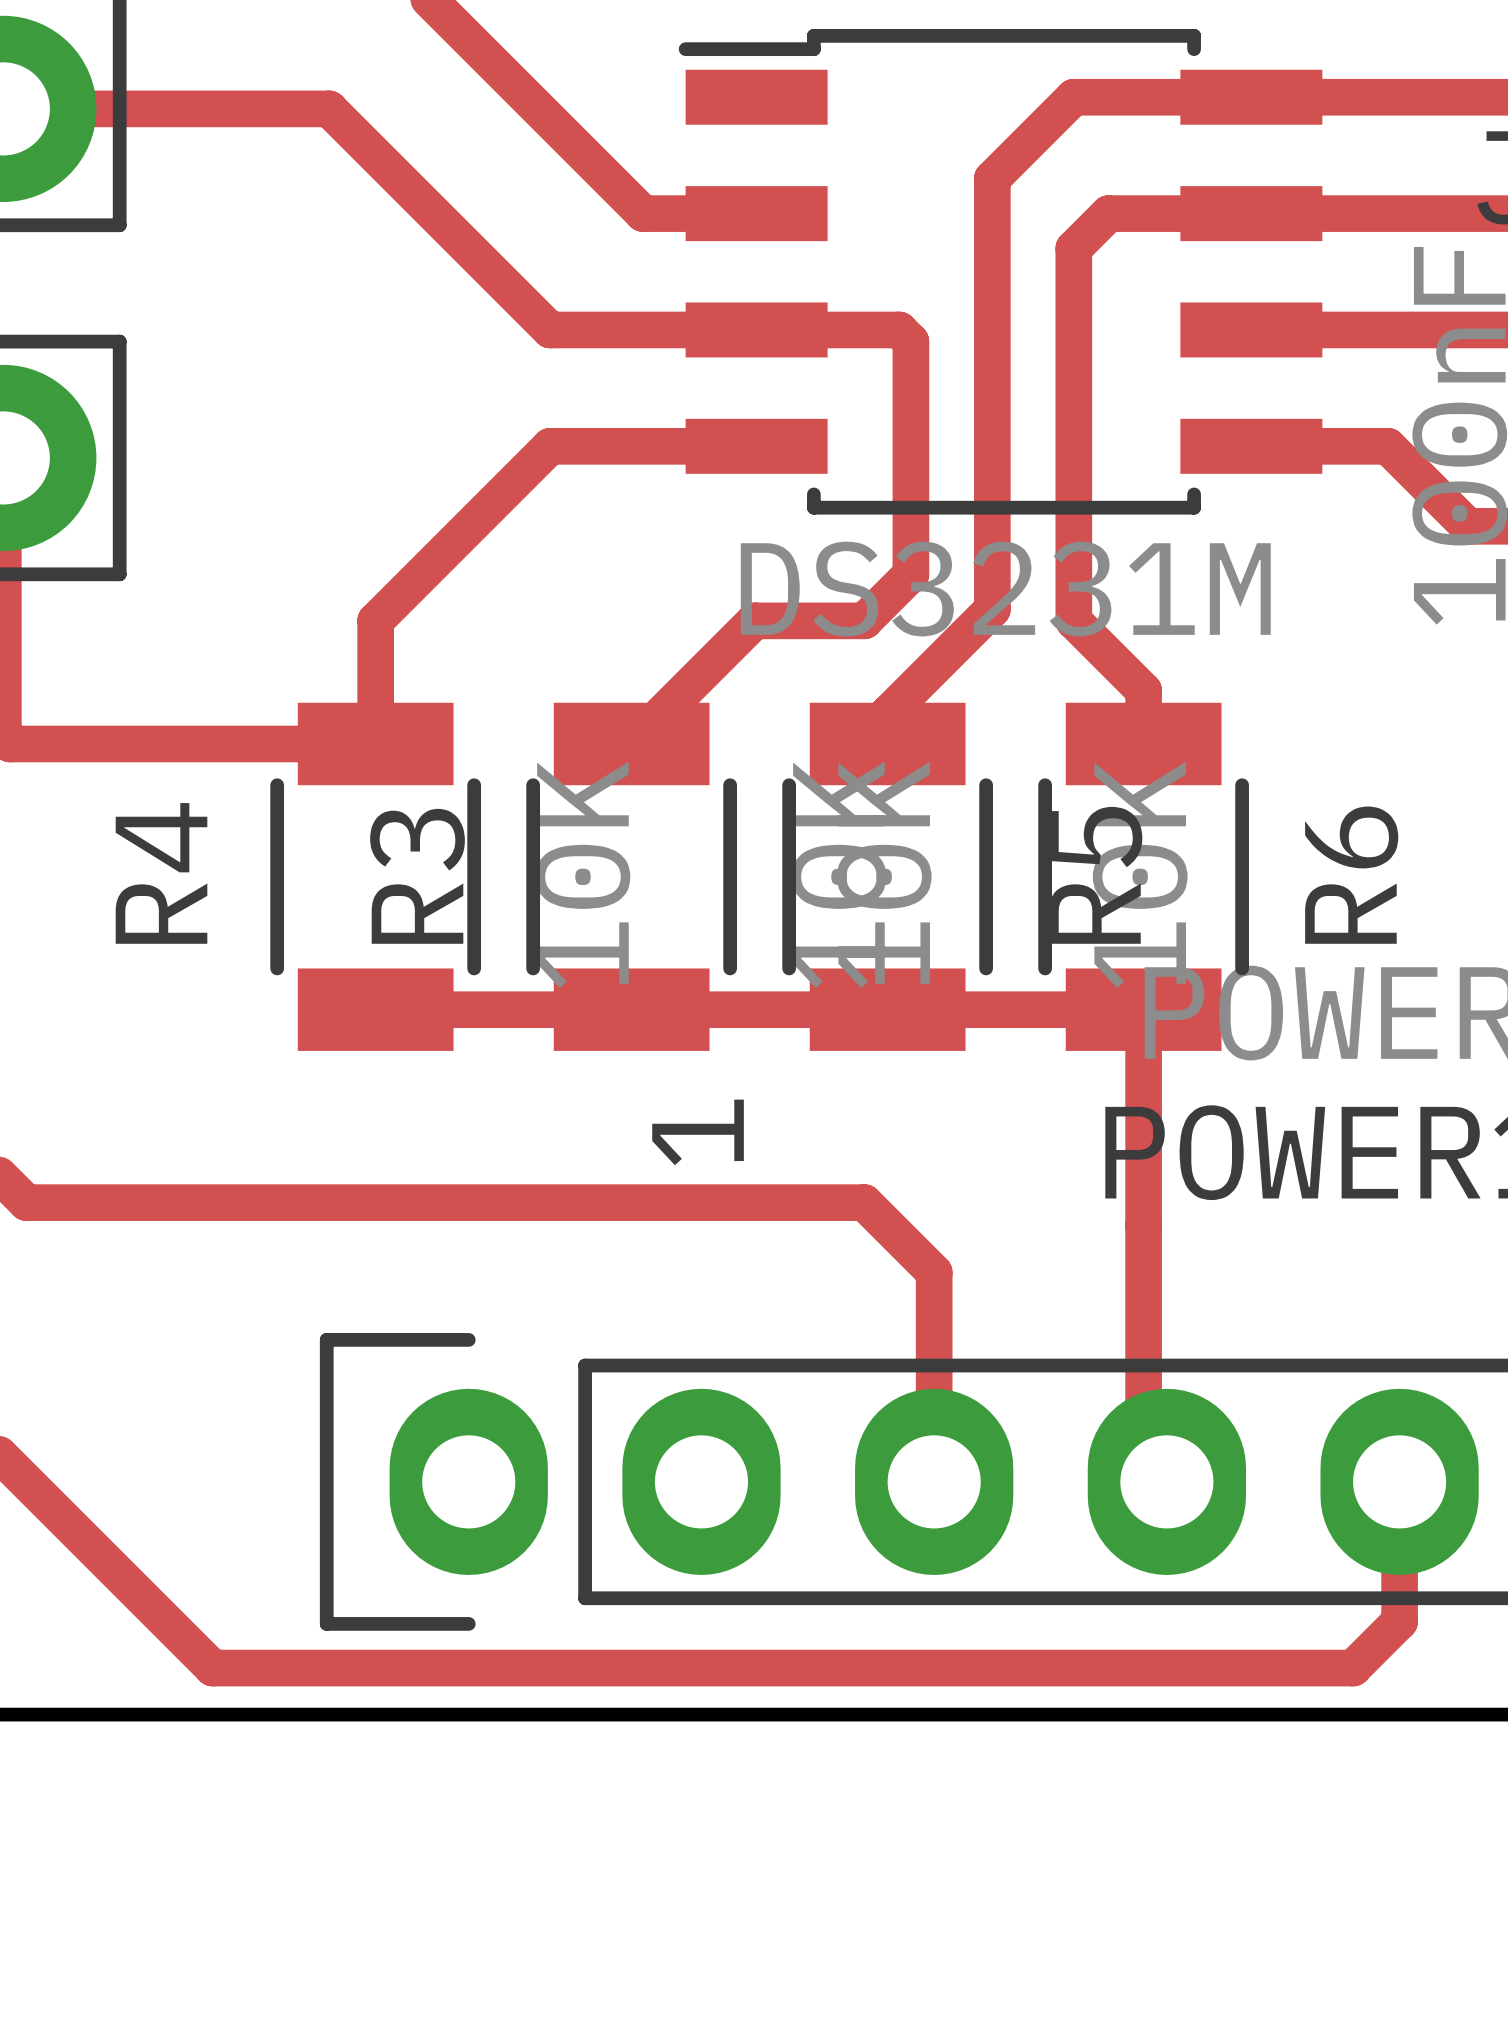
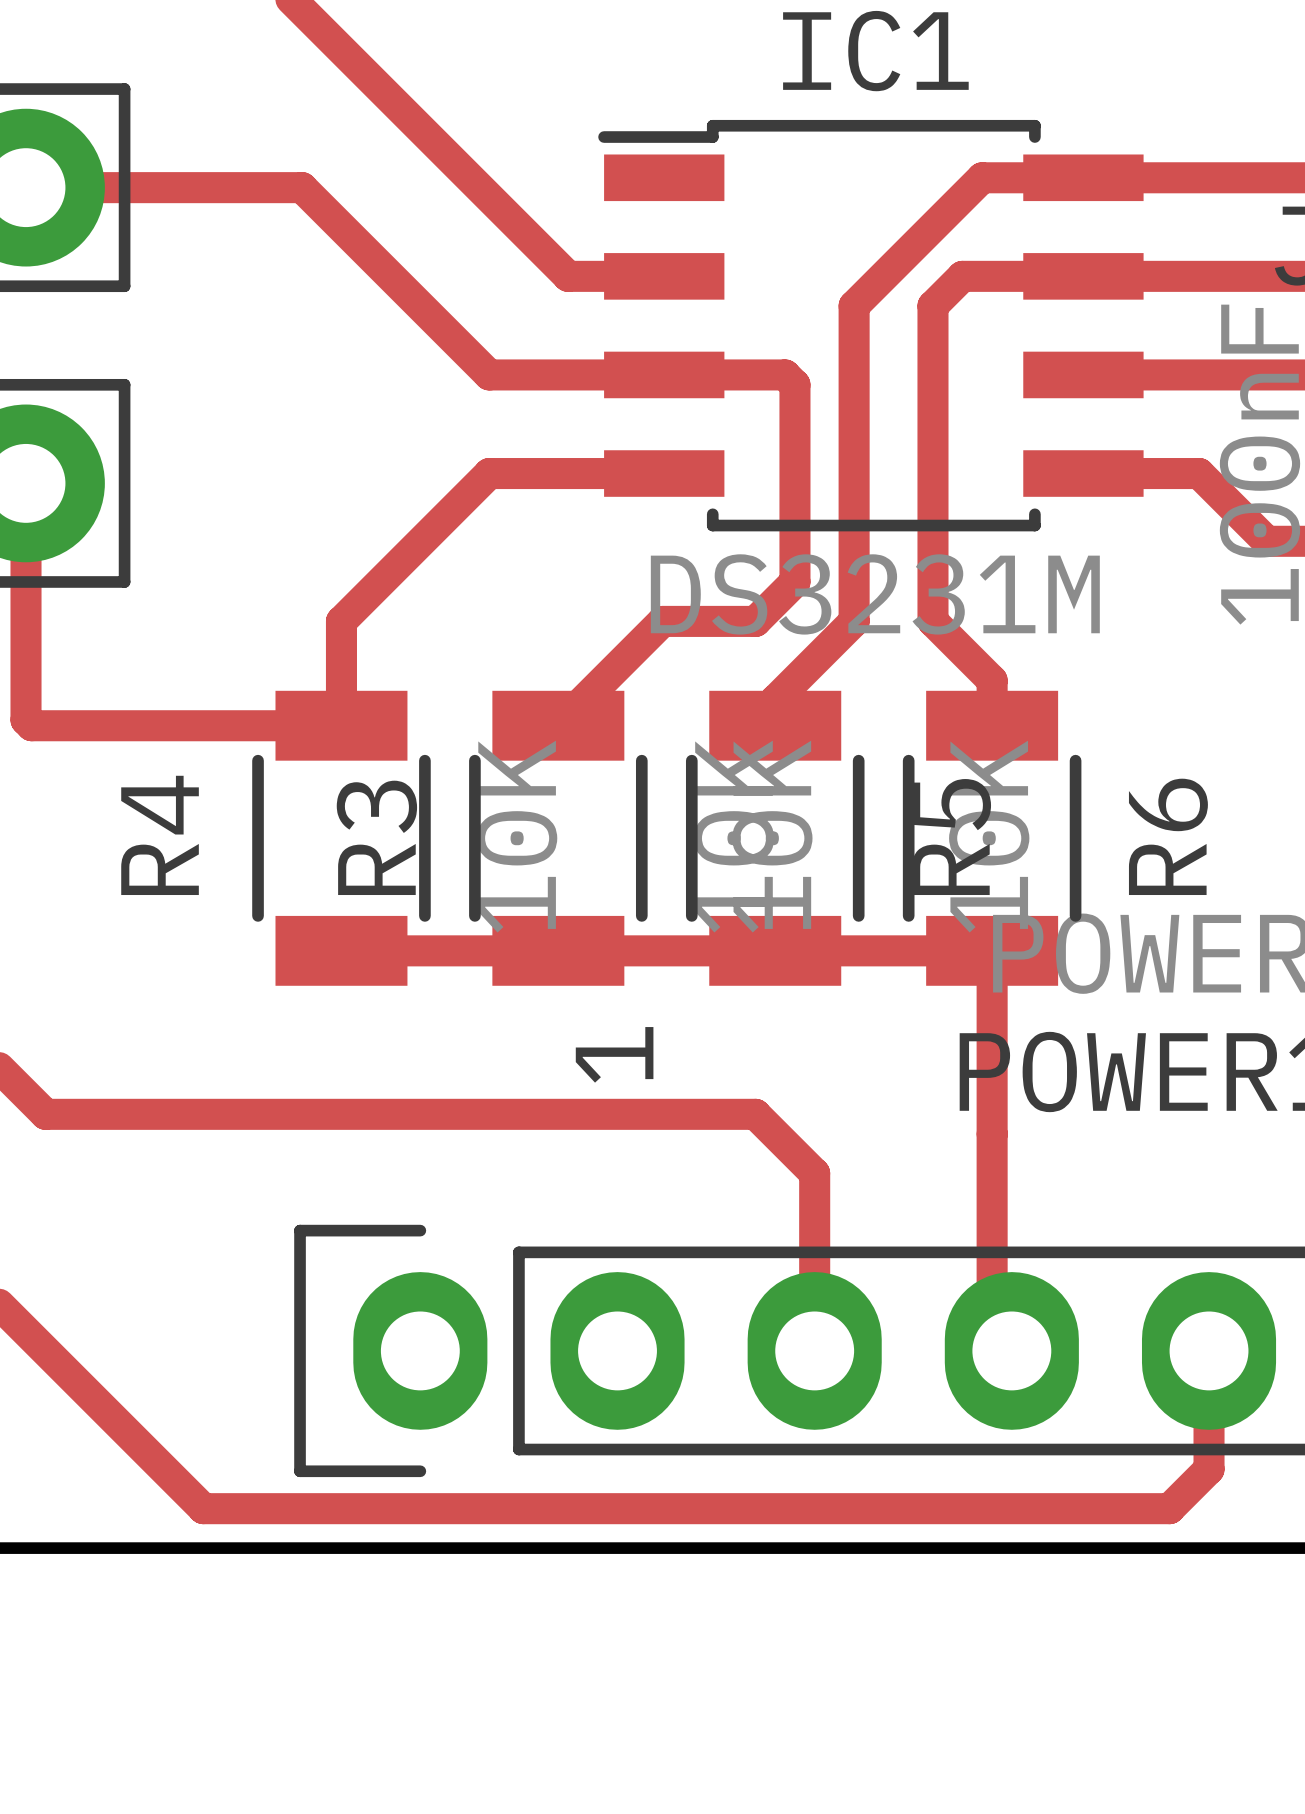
track: (1131, 97) (1073, 97) (992, 178) (992, 609) (980, 620) -> (982, 177) (854, 305) (854, 621)

